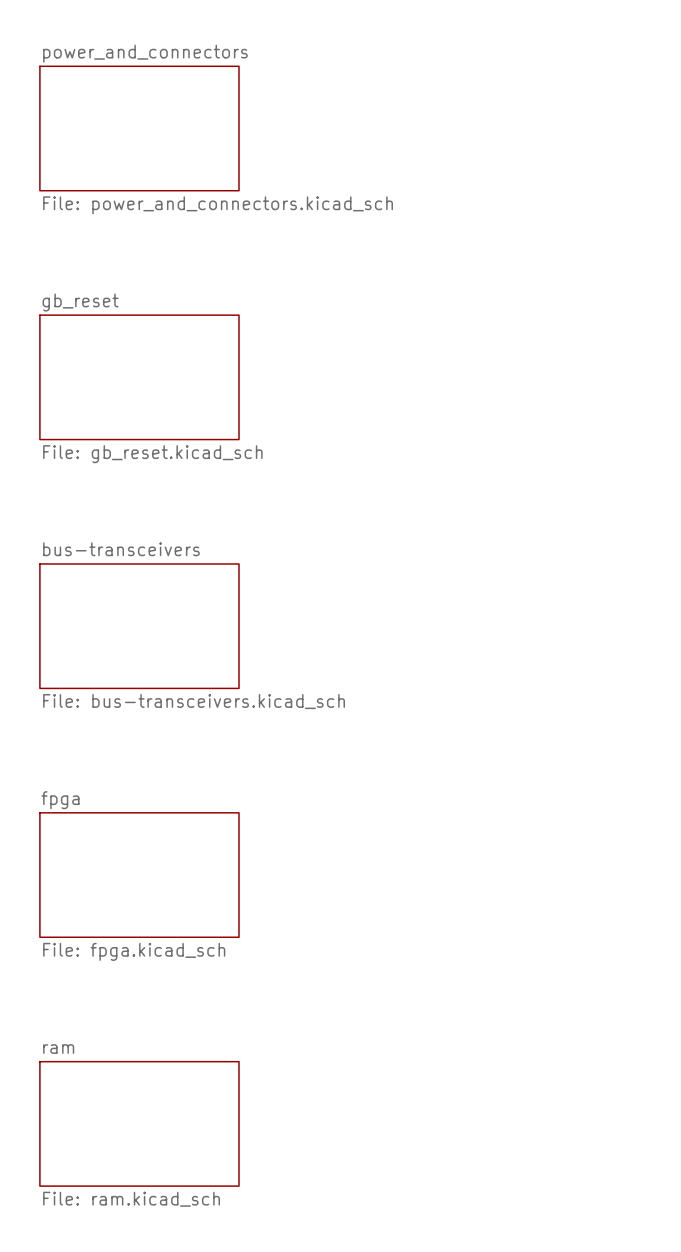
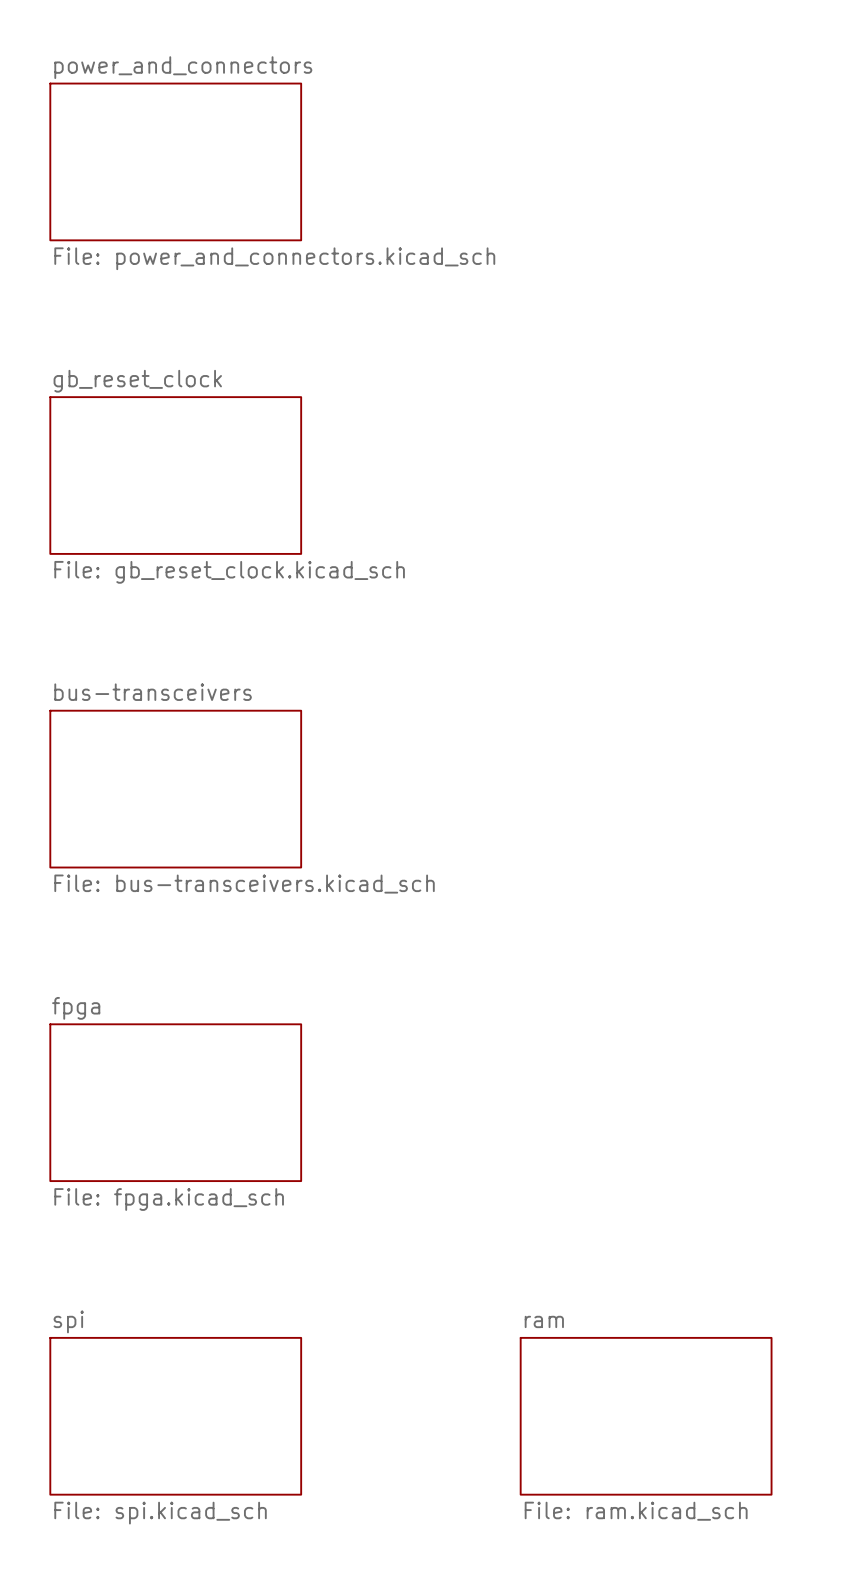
sheet gb_reset name: gb_reset (80, 302) -> gb_reset_clock (137, 381)
sheet gb_reset value: File: gb_reset.kicad_sch (152, 454) -> File: gb_reset_clock.kicad_sch (229, 572)
sheet ram name: ram (58, 1049) -> spi (68, 1321)
sheet ram: none -> File: ram.kicad_sch (646, 1416)
sheet ram value: File: ram.kicad_sch (131, 1199) -> File: spi.kicad_sch (160, 1513)

